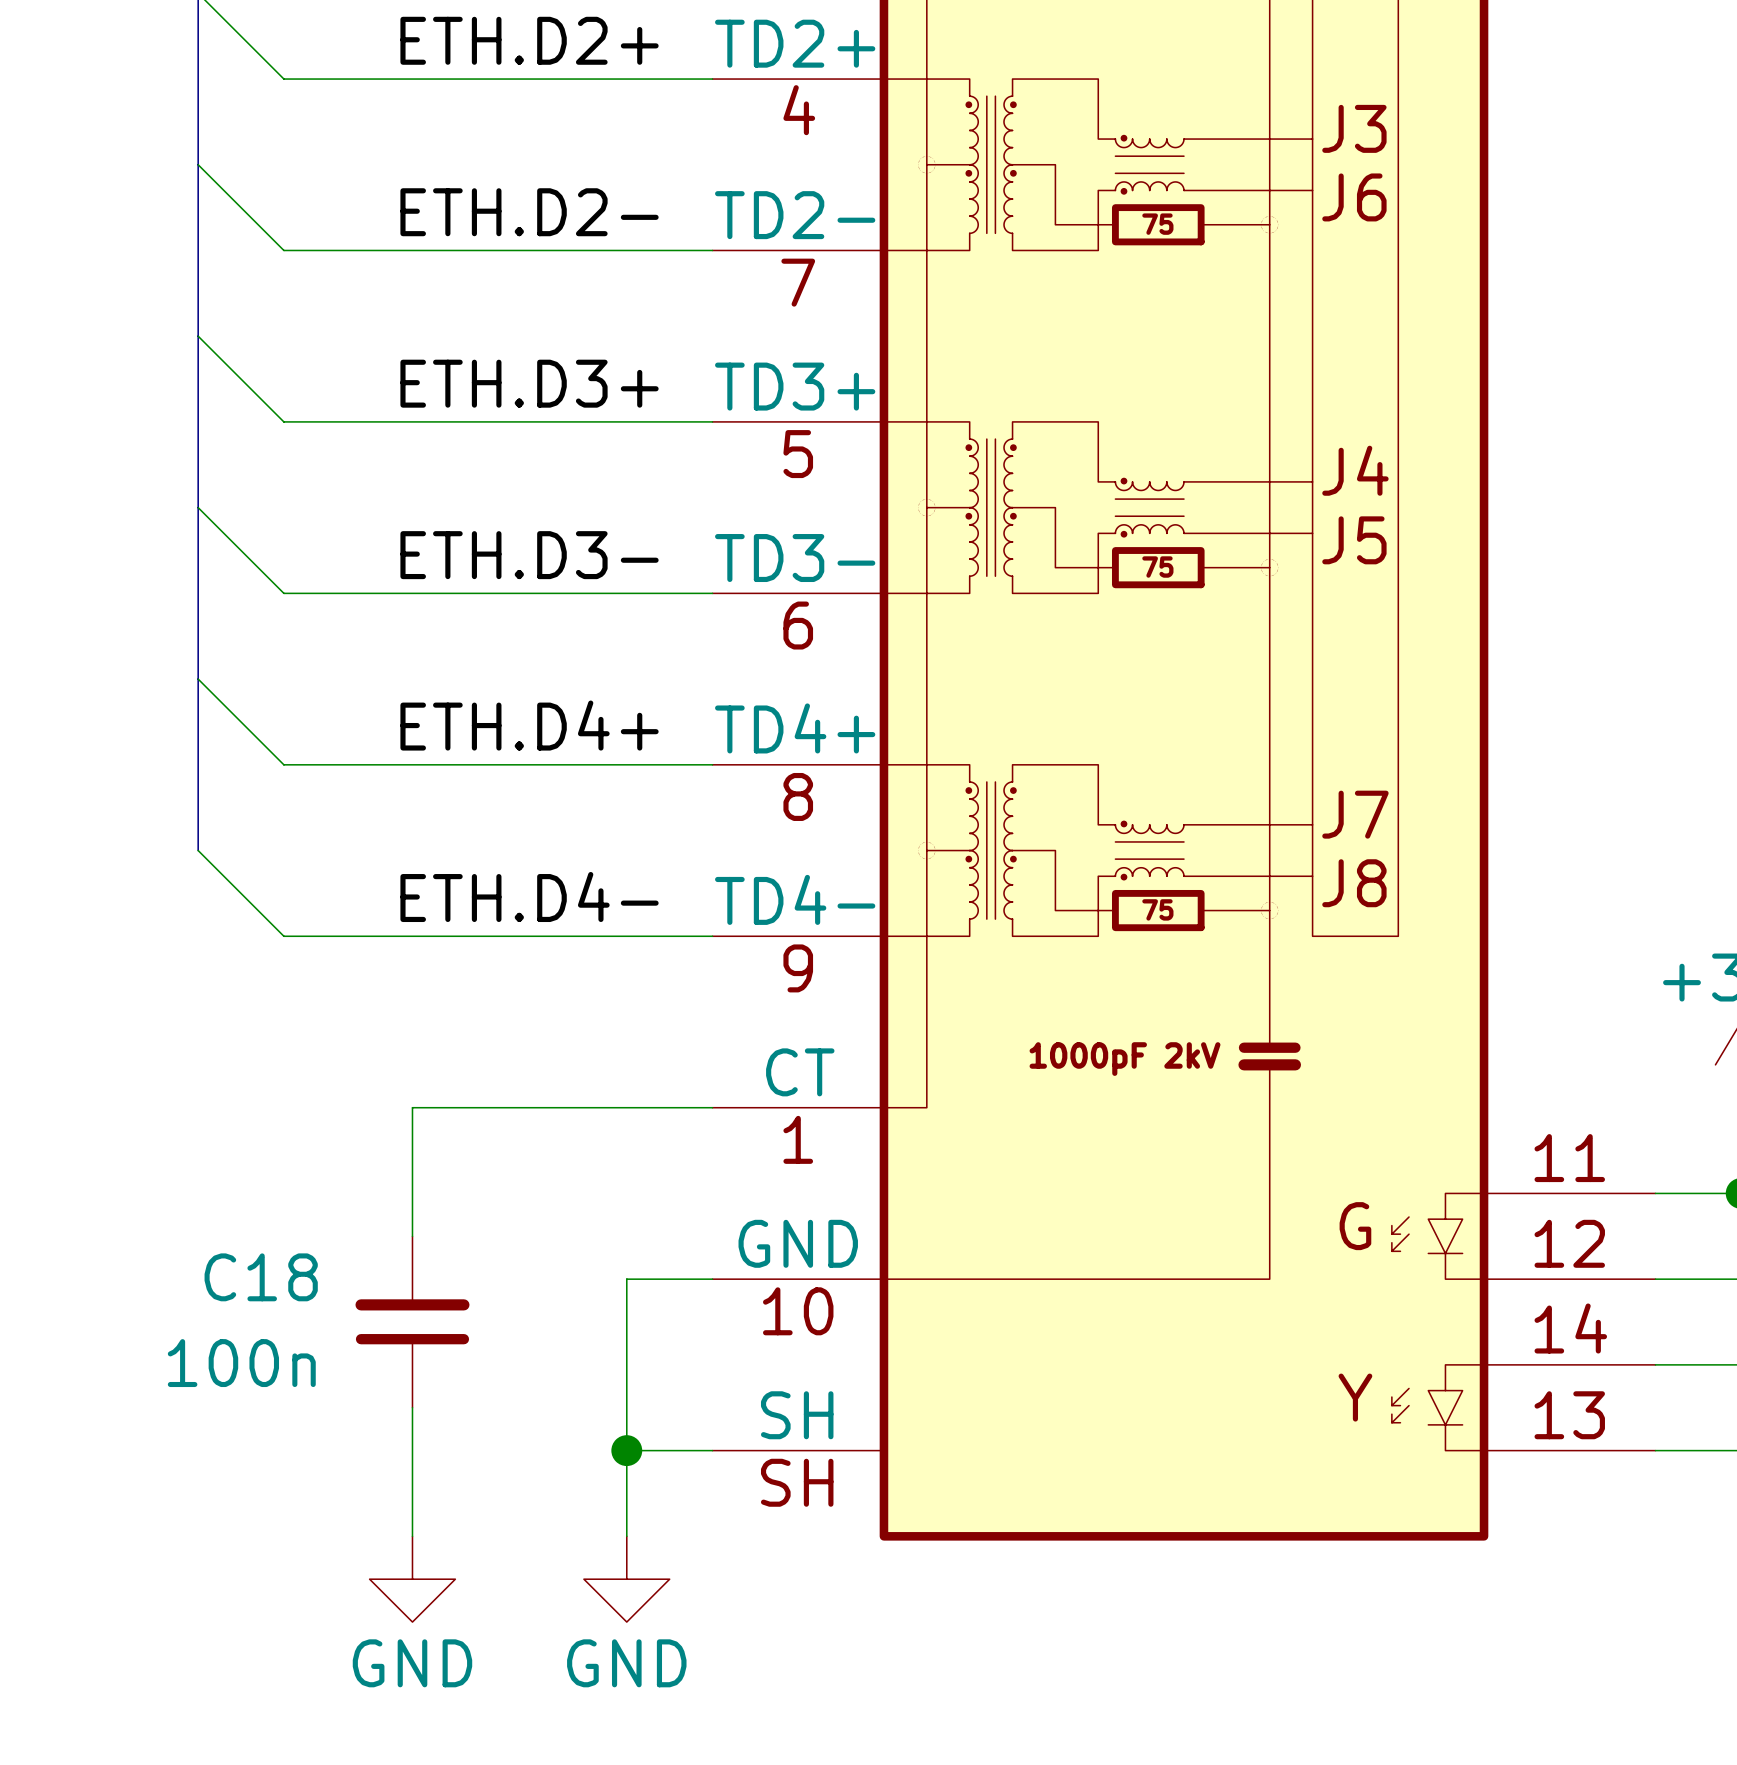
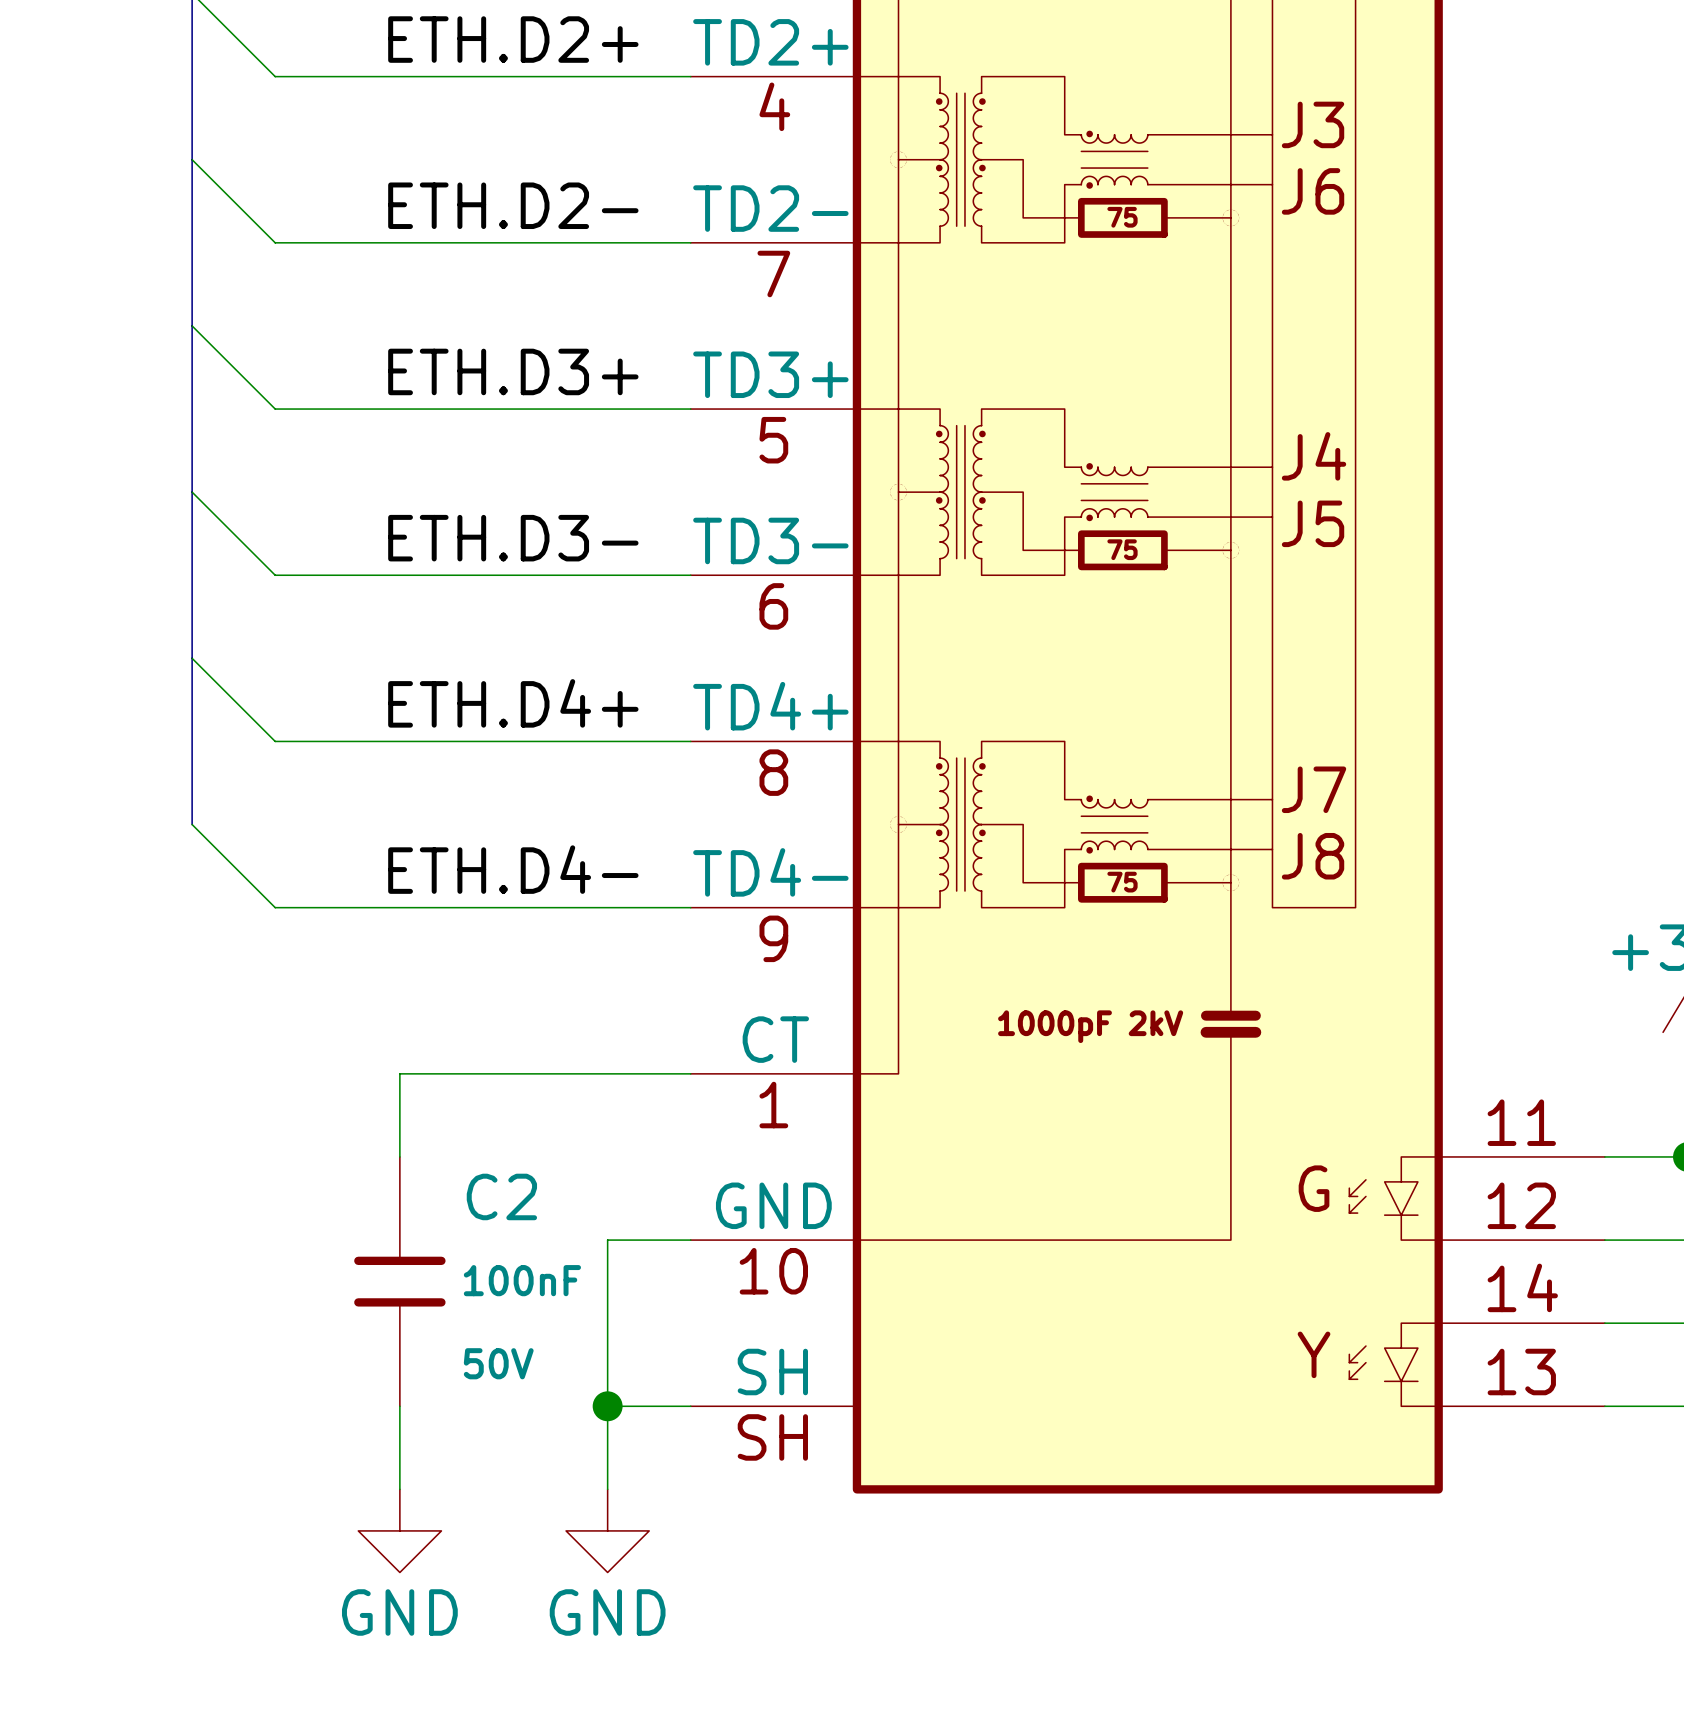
C18: (412, 1322) -> none
C2: none -> 100nF (399, 1281)

